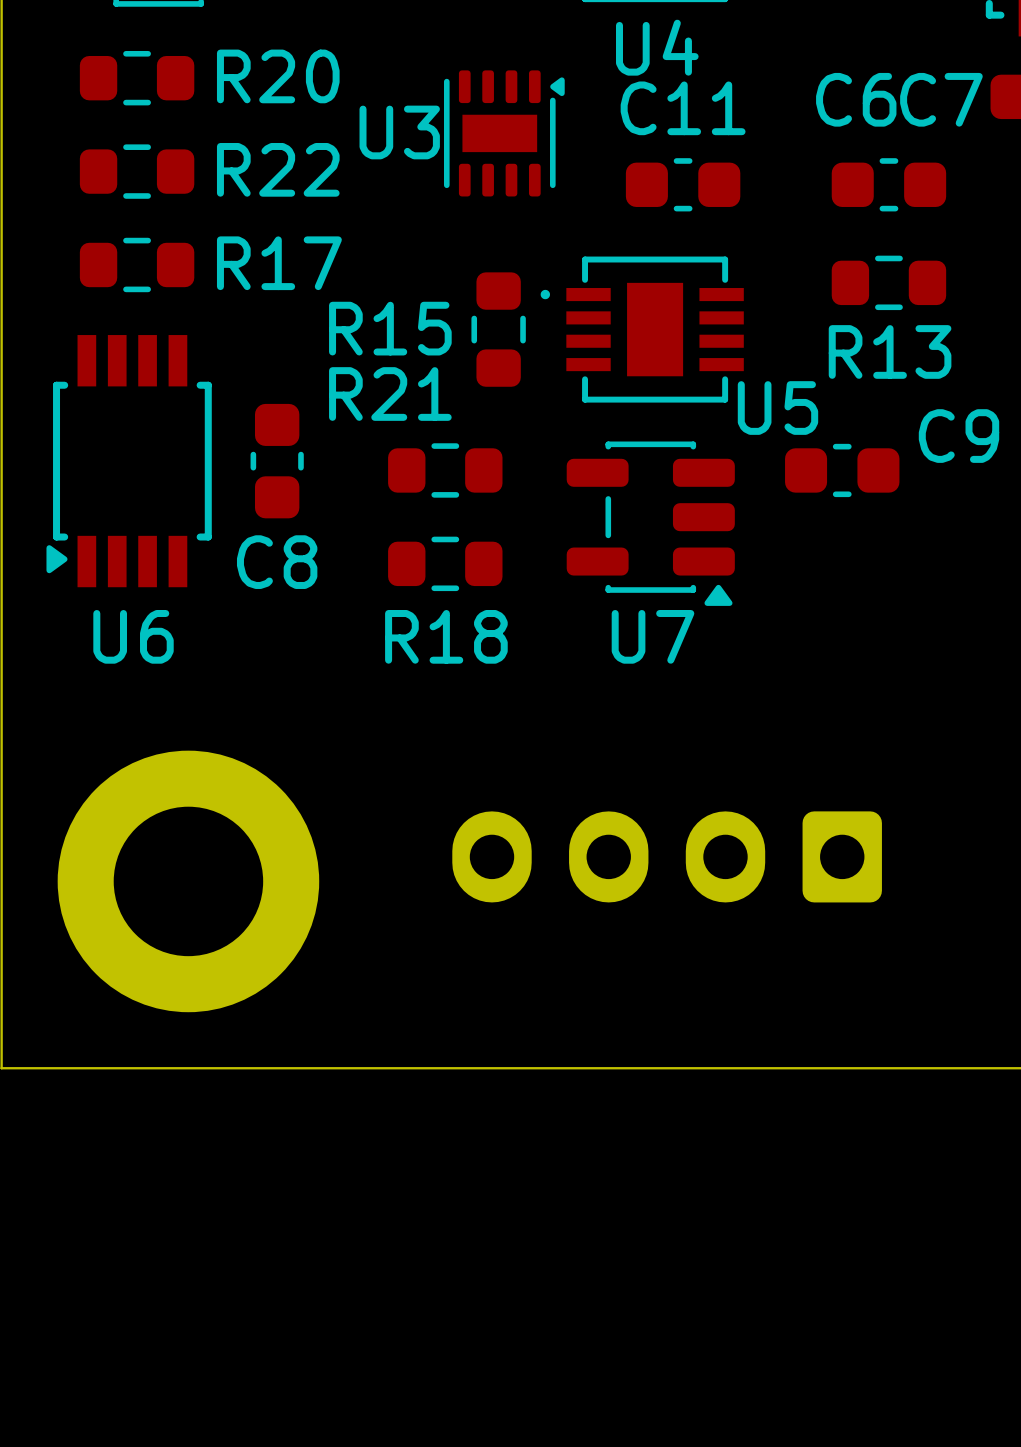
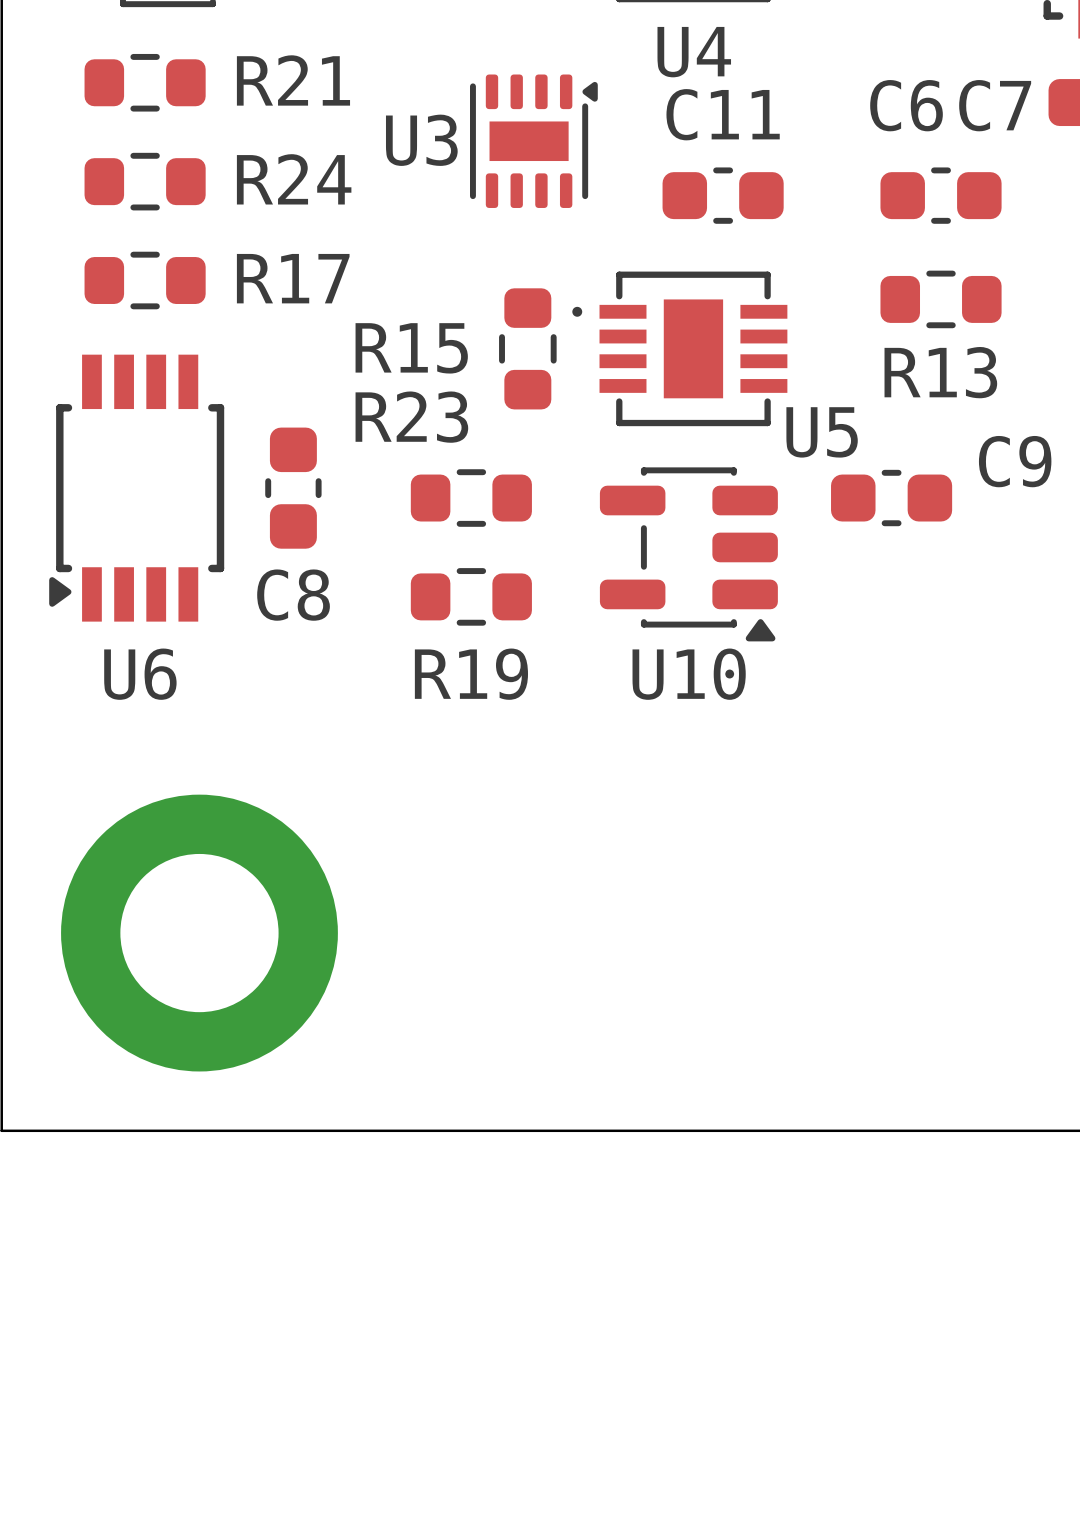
R20 name: R20 (278, 76) -> R21 (293, 80)
R22 name: R22 (278, 169) -> R24 (294, 179)
R21 name: R21 (390, 394) -> R23 (411, 417)
R18 name: R18 (446, 636) -> R19 (471, 674)
U7 name: U7 (653, 636) -> U10 (689, 674)
part: (667, 856) -> none

